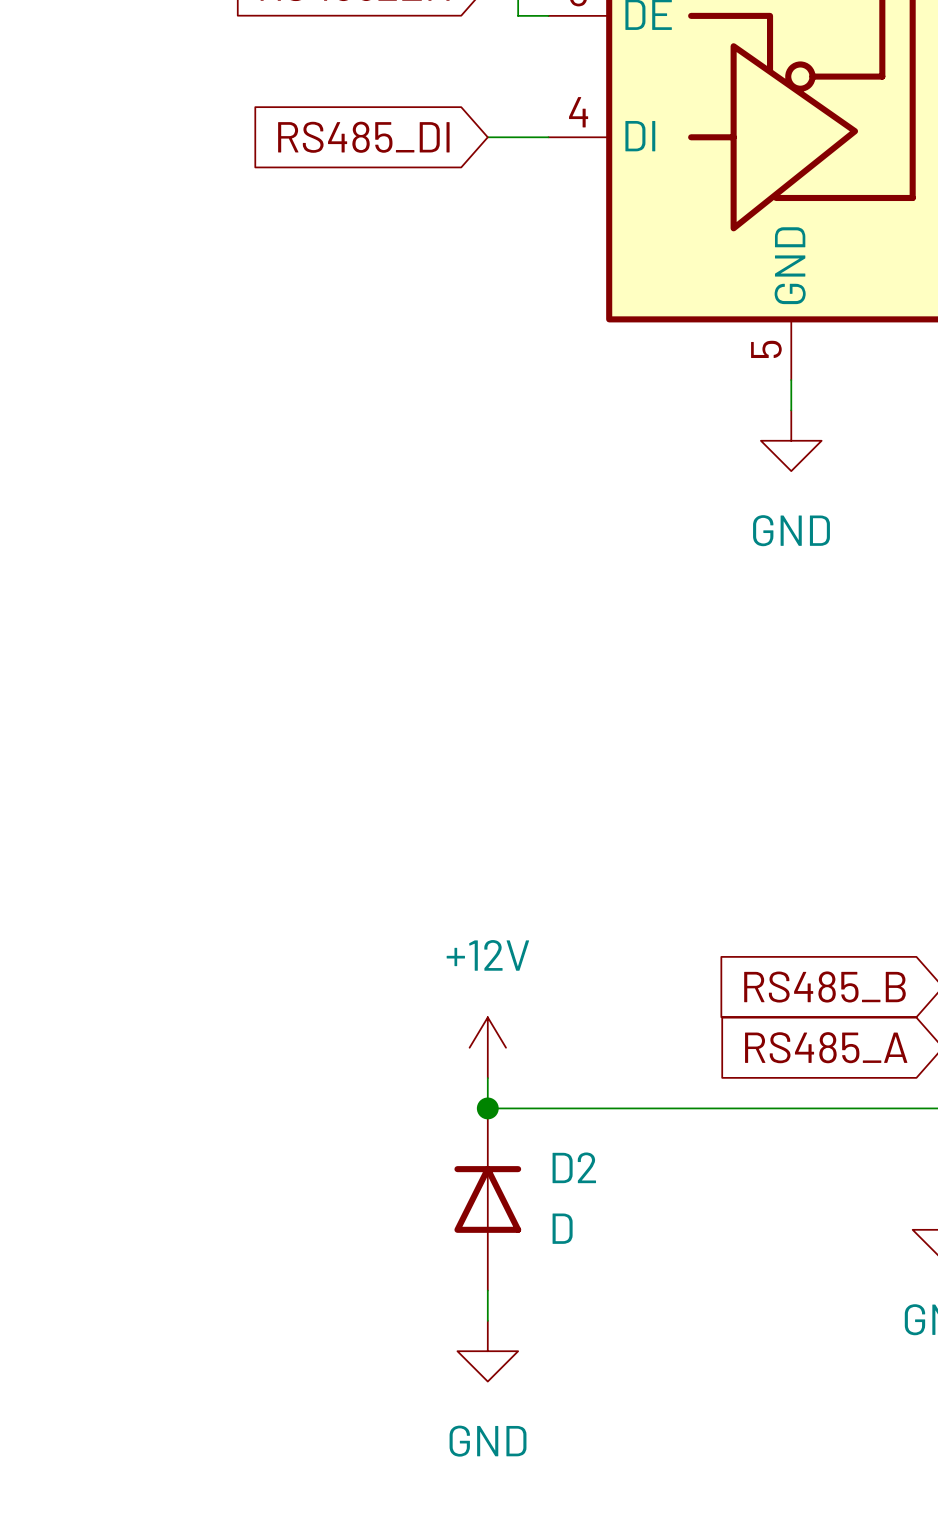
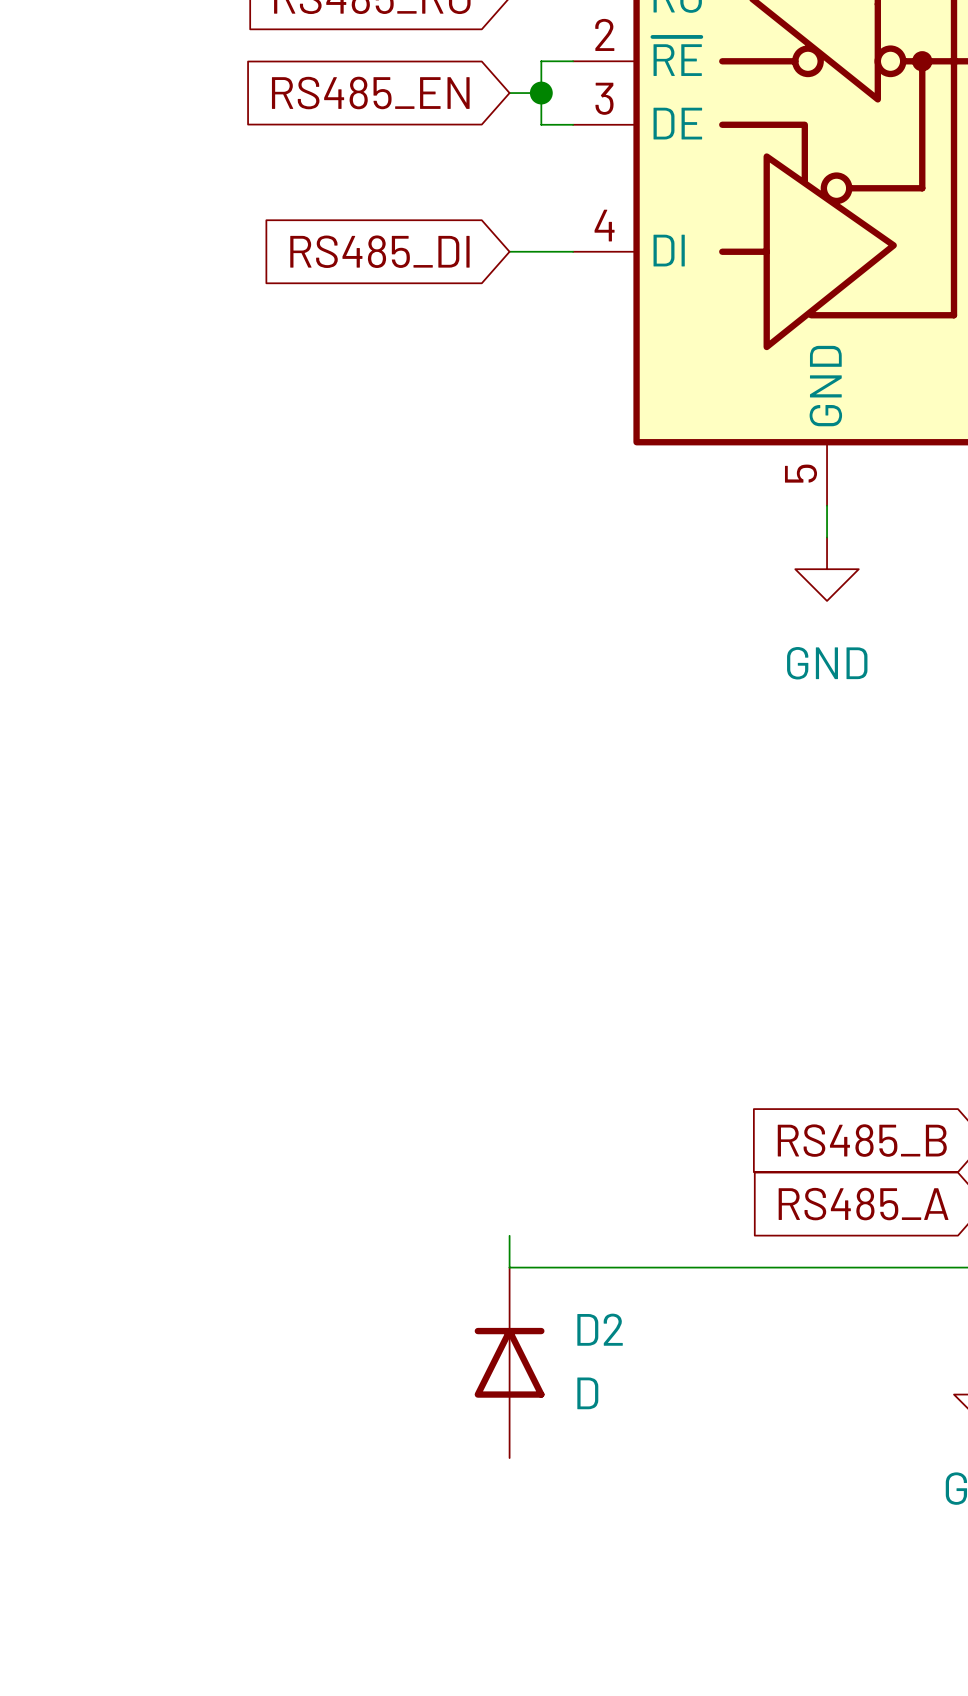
power symbol: +12V (487, 1047) -> none
junction: (487, 1108) -> none
wire: (487, 1290) (487, 1320) -> none
power symbol: GND (487, 1351) -> none

